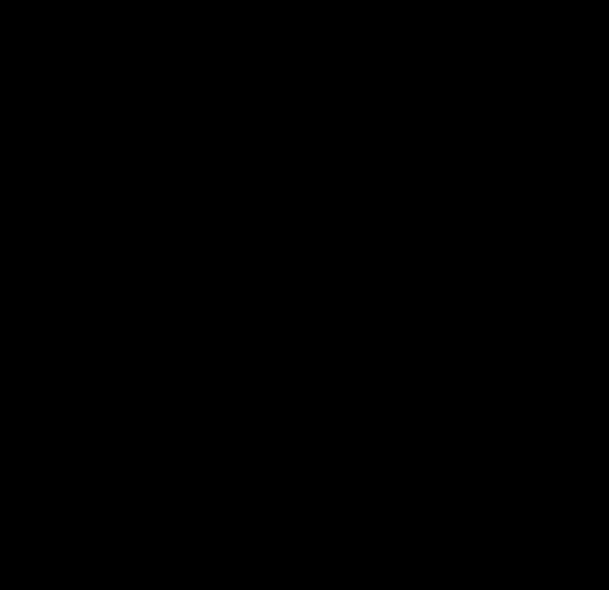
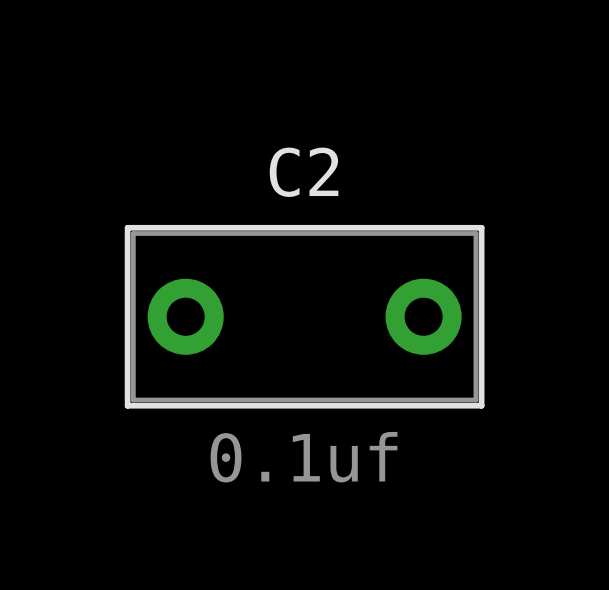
C2: none -> 0.1uf (304, 316)

